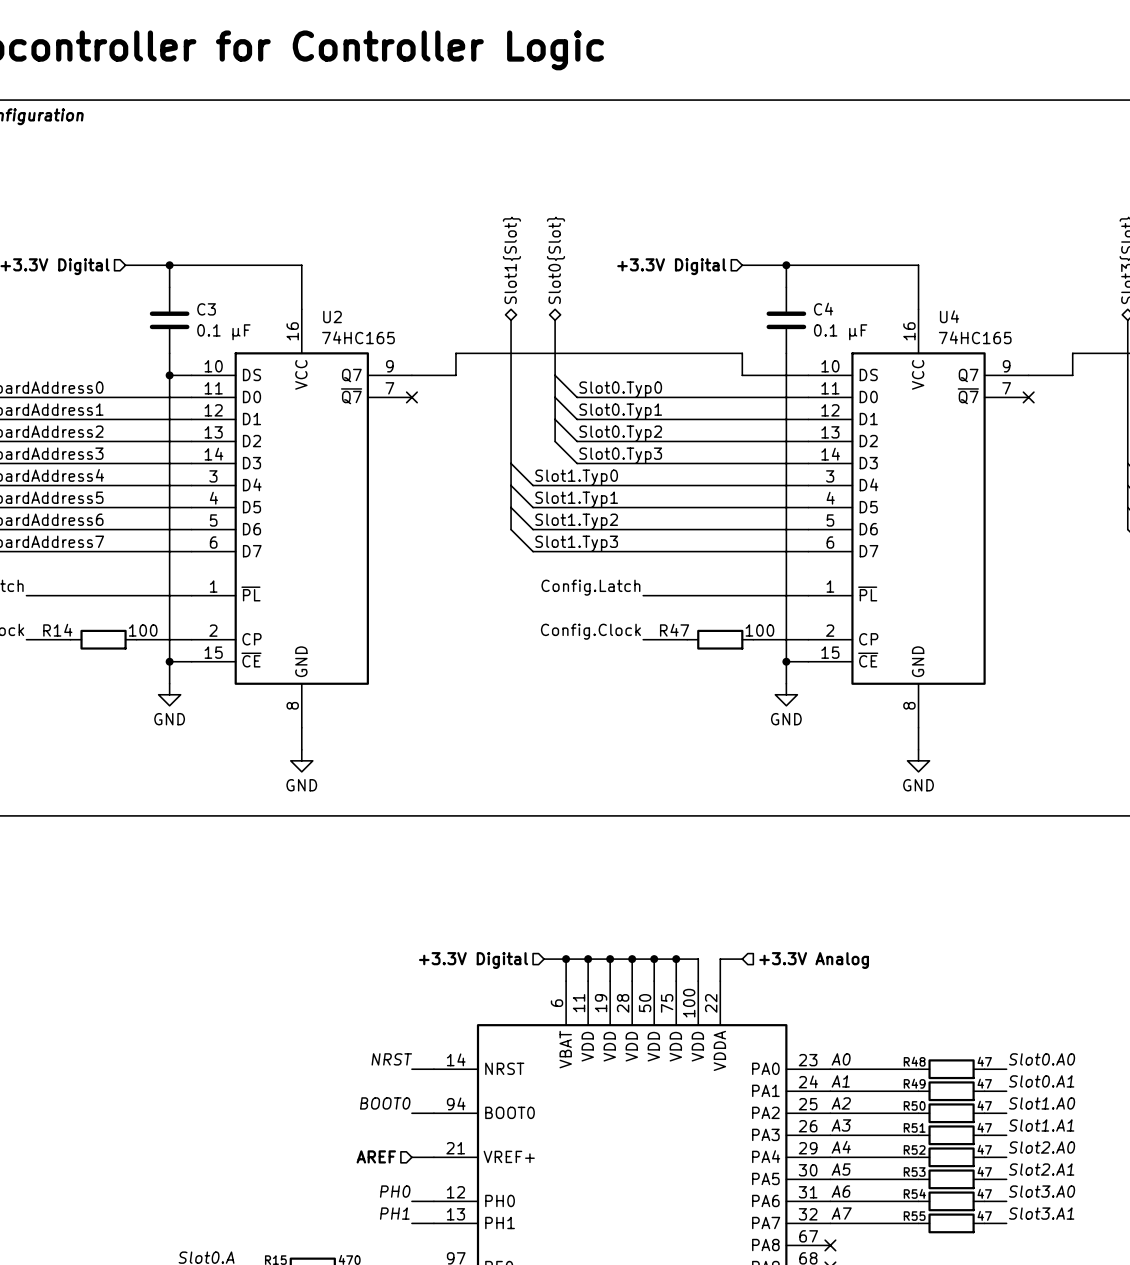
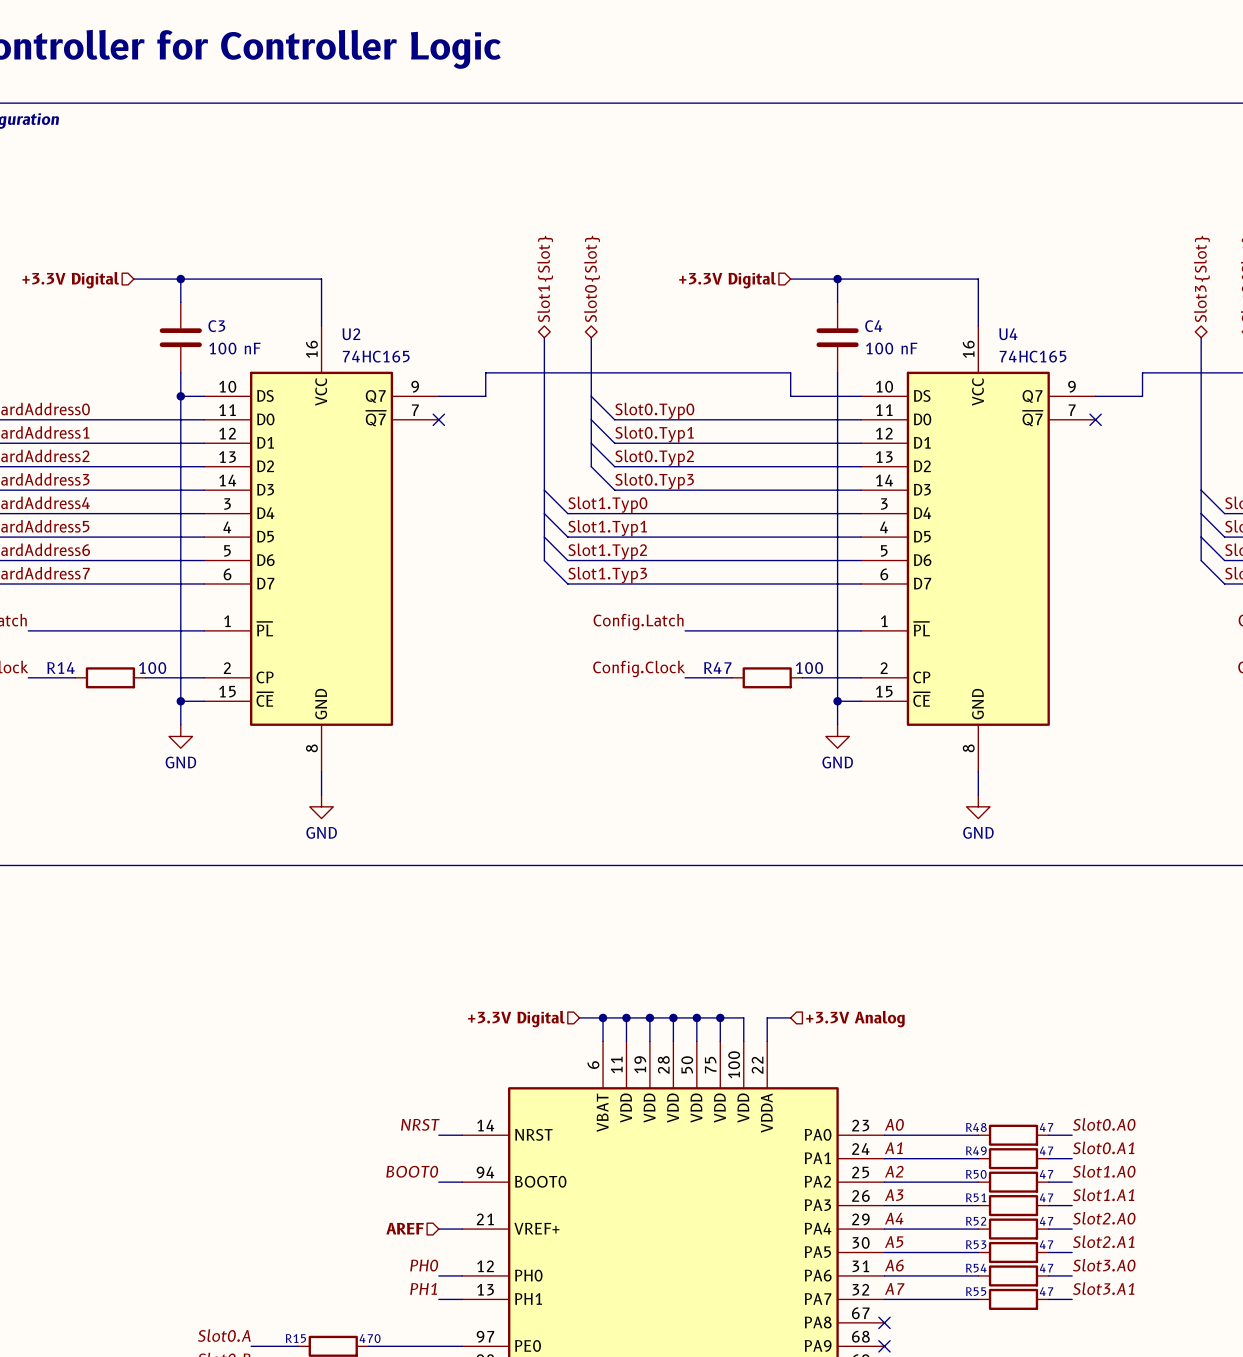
C3 value: 0.1 µF (223, 332) -> 100 nF (234, 348)
C4 value: 0.1 µF (840, 332) -> 100 nF (891, 348)

